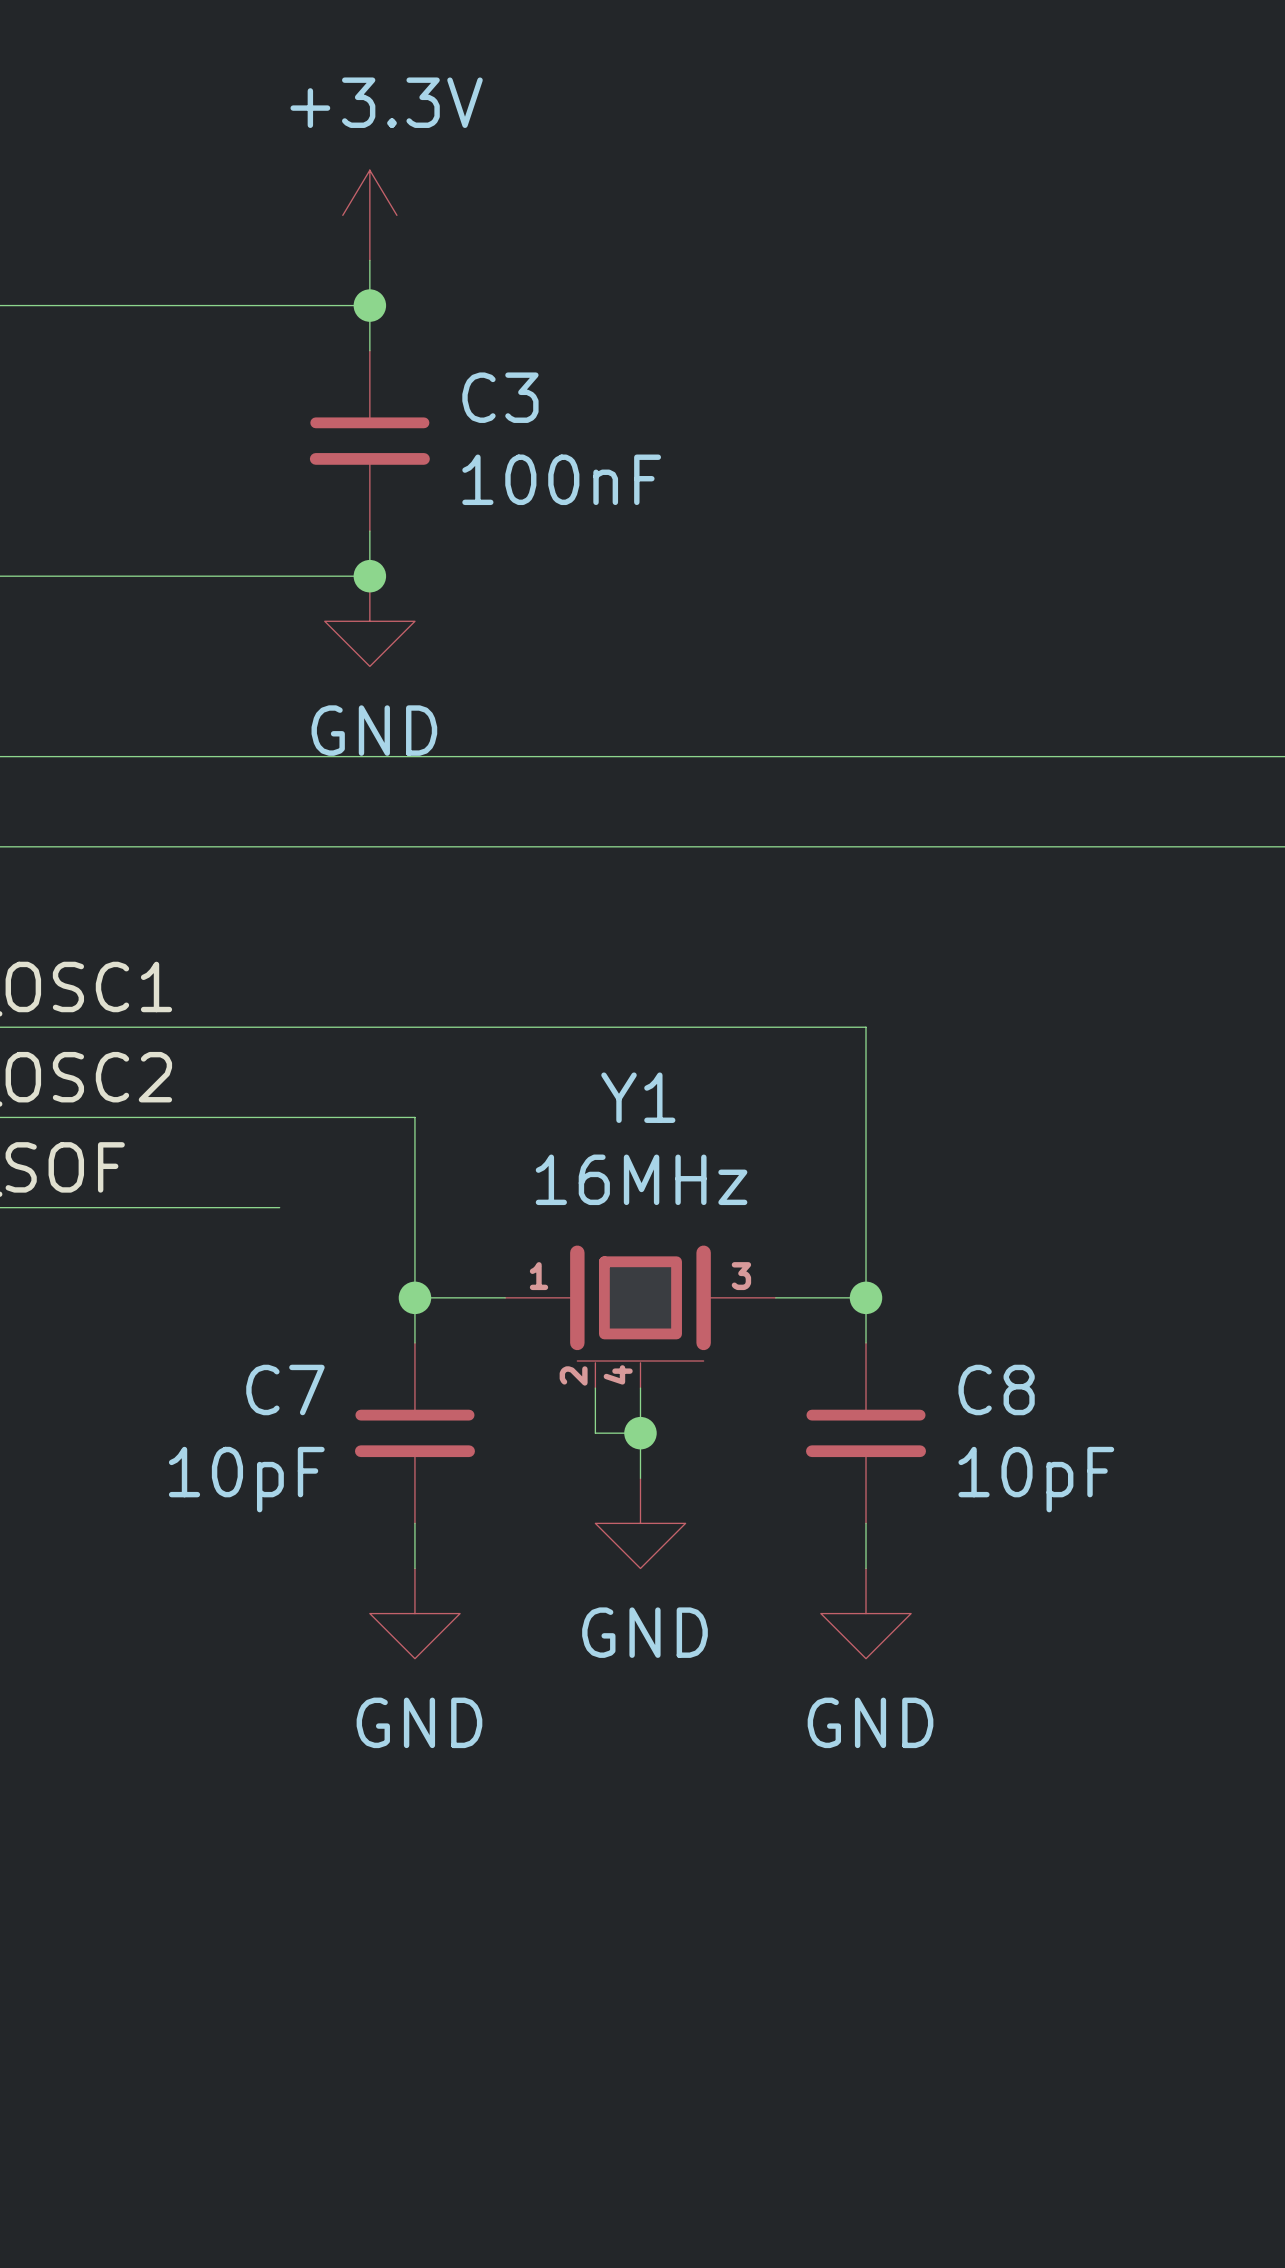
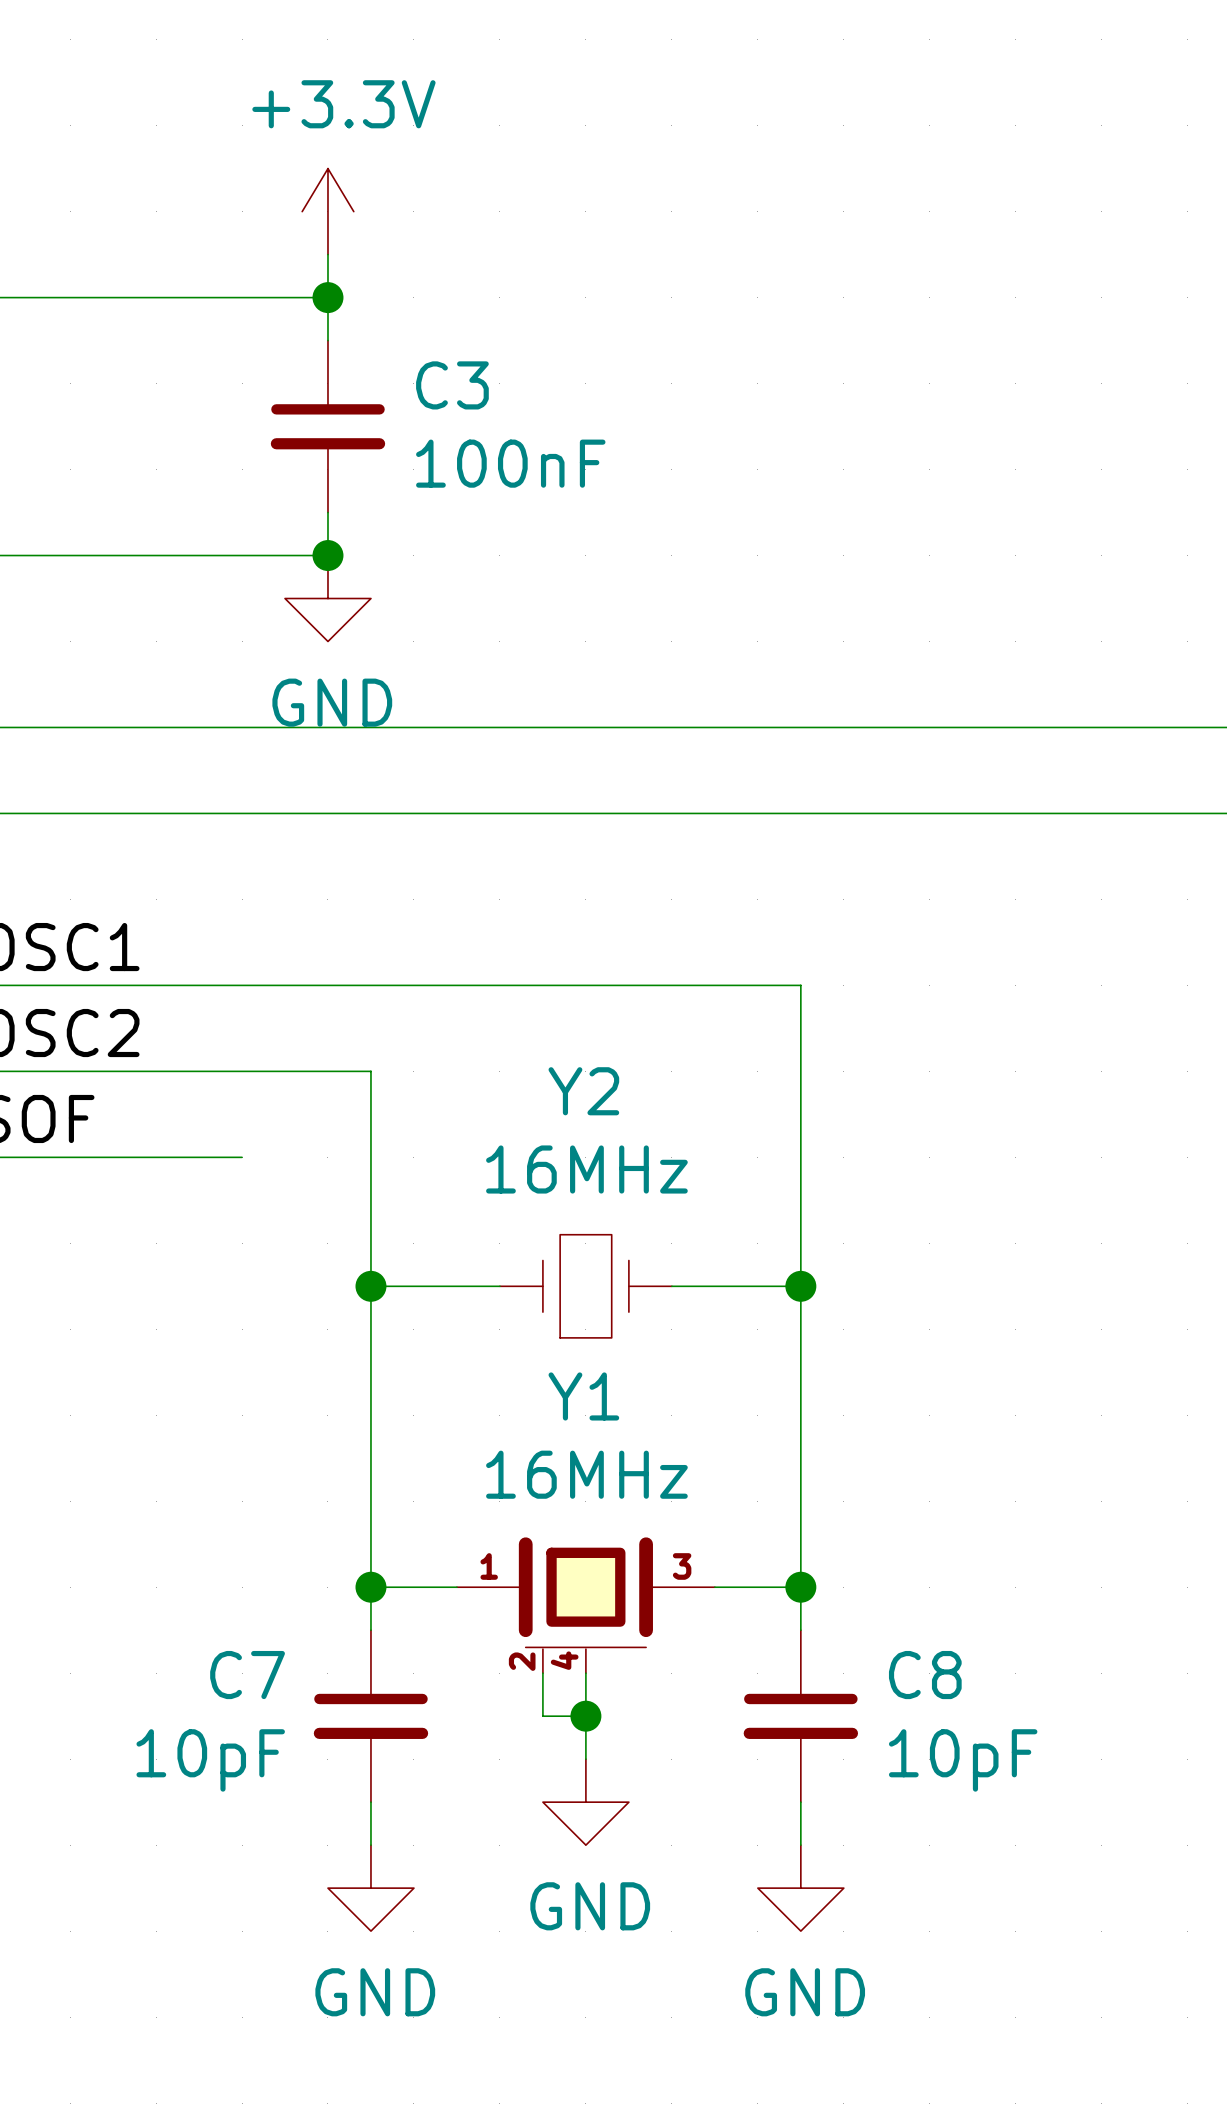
wire: (414, 1297) (505, 1297) -> (370, 1587) (456, 1587)
junction position: (414, 1297) -> (370, 1286)
wire: (775, 1297) (866, 1297) -> (714, 1587) (800, 1587)
junction position: (866, 1297) -> (800, 1286)
Y1 position: (640, 1316) -> (585, 1605)
wire: none -> (499, 1286) (370, 1286) (370, 1458)
Y2: none -> 16MHz (585, 1286)
wire: none -> (671, 1286) (800, 1286) (800, 1458)
wire: (595, 1388) (595, 1433) (640, 1433) -> (542, 1673) (542, 1716) (585, 1716)
wire: (640, 1388) (640, 1478) -> (585, 1673) (585, 1759)
C7 position: (414, 1433) -> (370, 1716)
junction: (640, 1433) -> none
C8 position: (866, 1433) -> (800, 1716)
power symbol: GND (640, 1523) -> none
wire: none -> (370, 1501) (370, 1630)
wire: none -> (800, 1501) (800, 1630)
power symbol: GND (414, 1613) -> none
power symbol: GND (866, 1613) -> none
junction: none -> (370, 1587)
junction: none -> (800, 1587)
junction: none -> (585, 1716)
wire: none -> (370, 1802) (370, 1845)
power symbol: none -> GND (585, 1802)
wire: none -> (800, 1802) (800, 1845)
power symbol: none -> GND (370, 1888)
power symbol: none -> GND (800, 1888)

